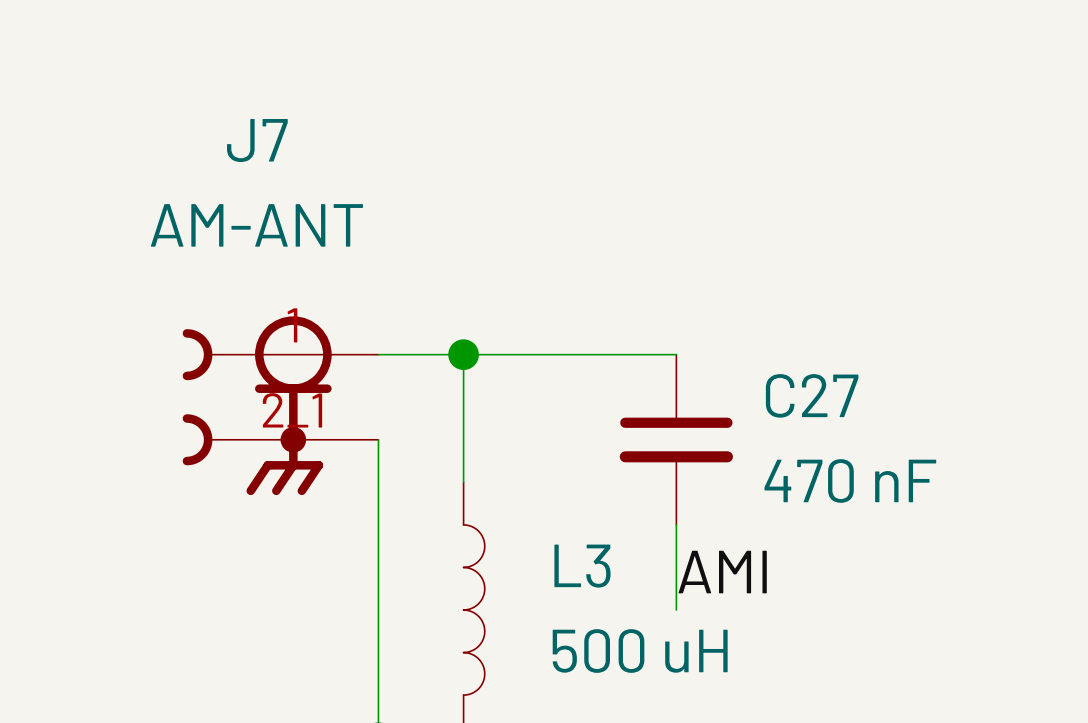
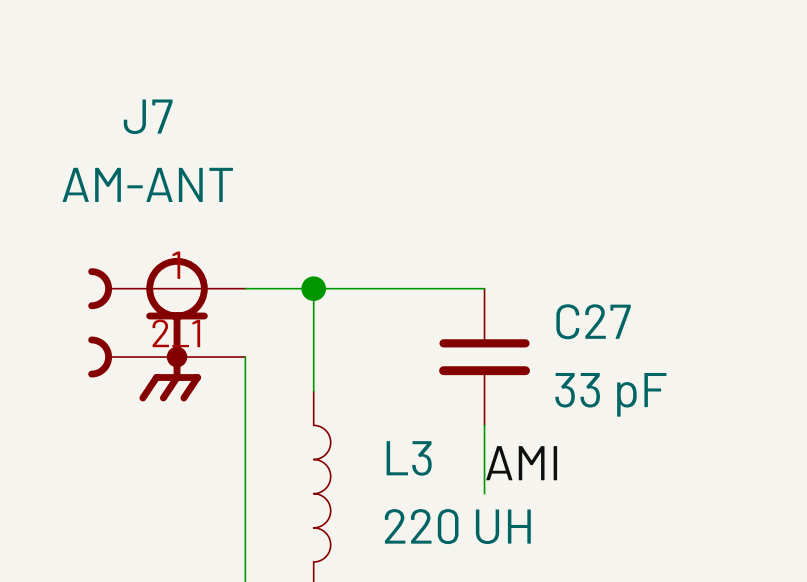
C27 value: 470 nF (850, 480) -> 33 pF (610, 394)
L3 value: 500 uH (640, 651) -> 220 UH (457, 526)

